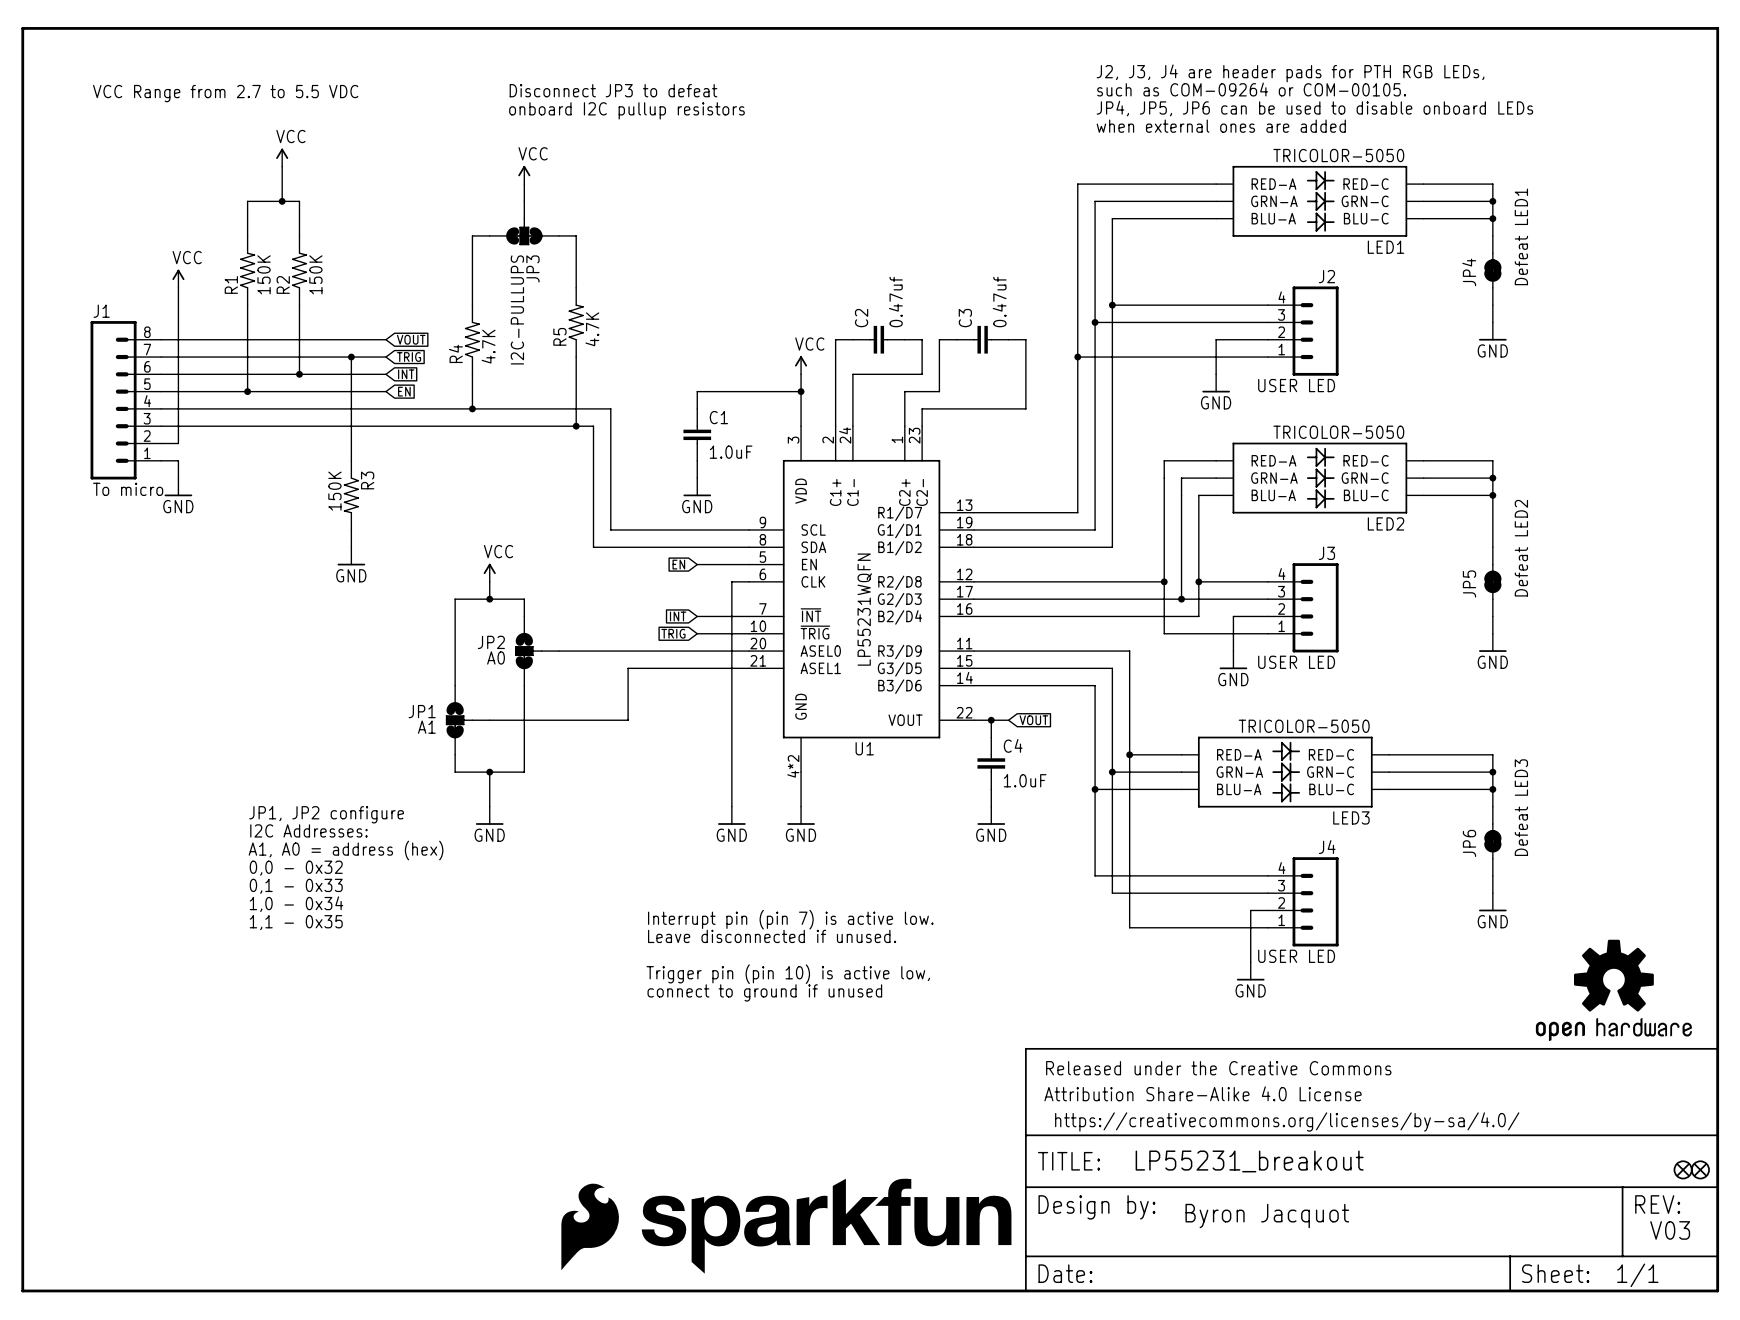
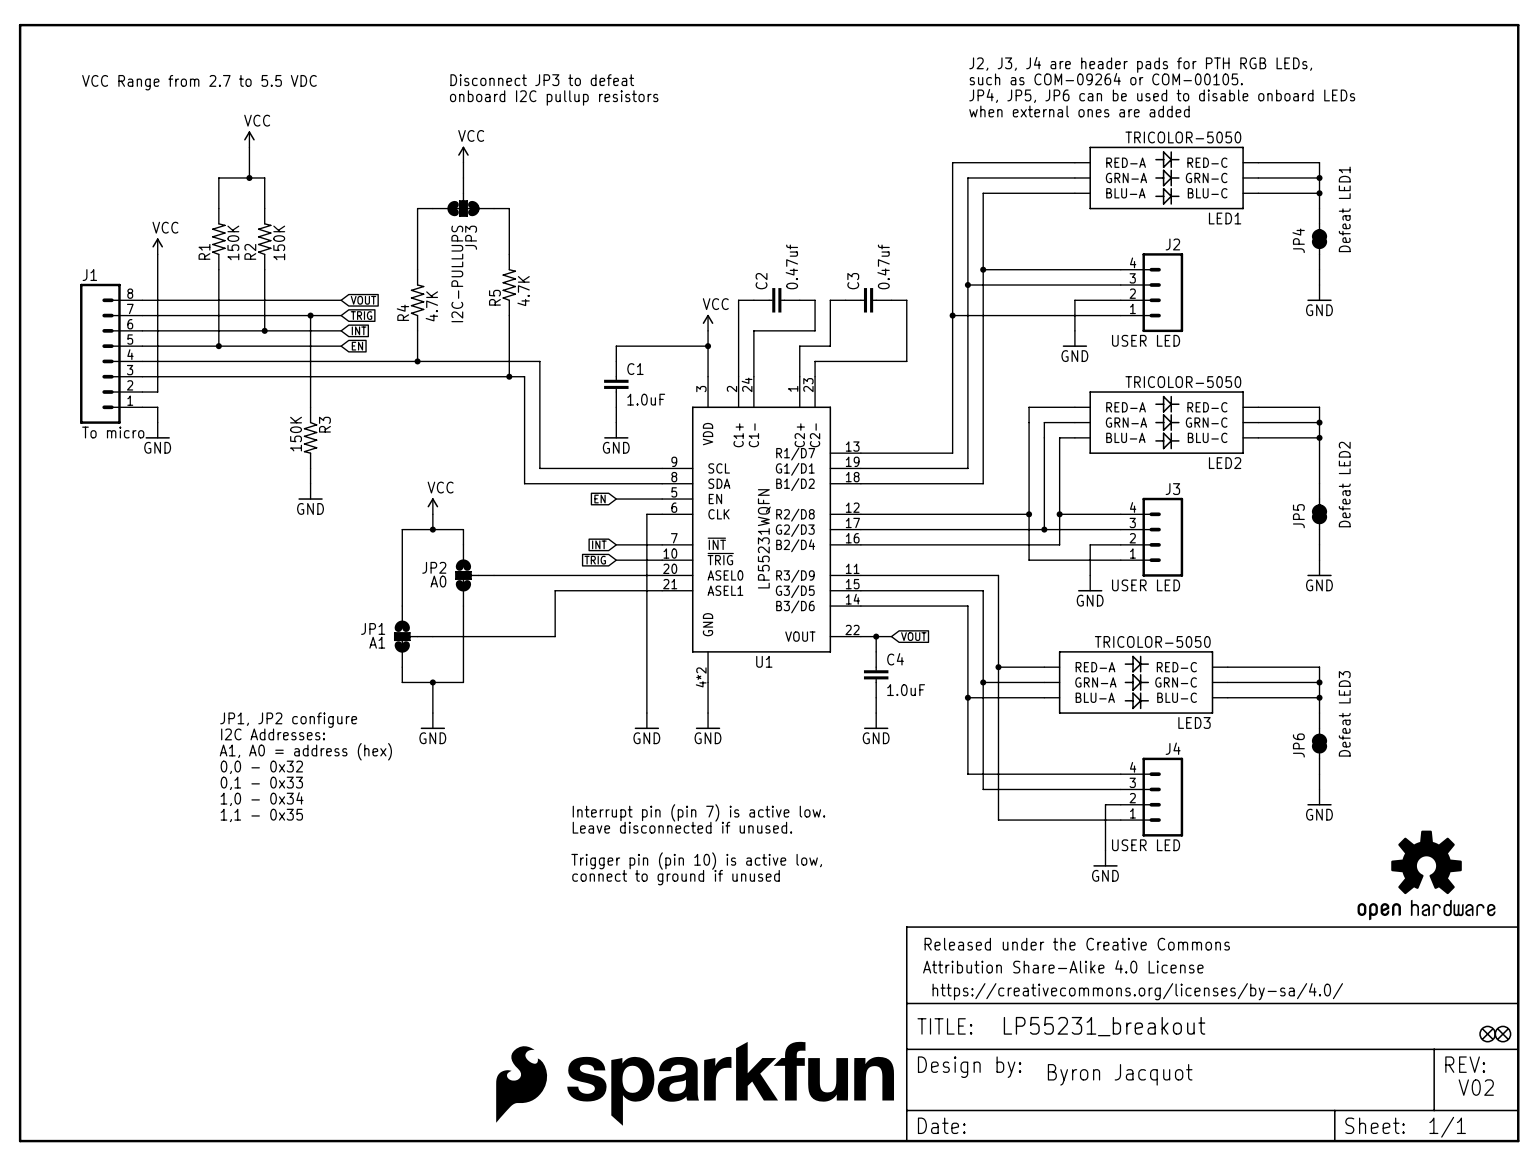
text: V03 (1670, 1230) -> V02 (1476, 1087)

